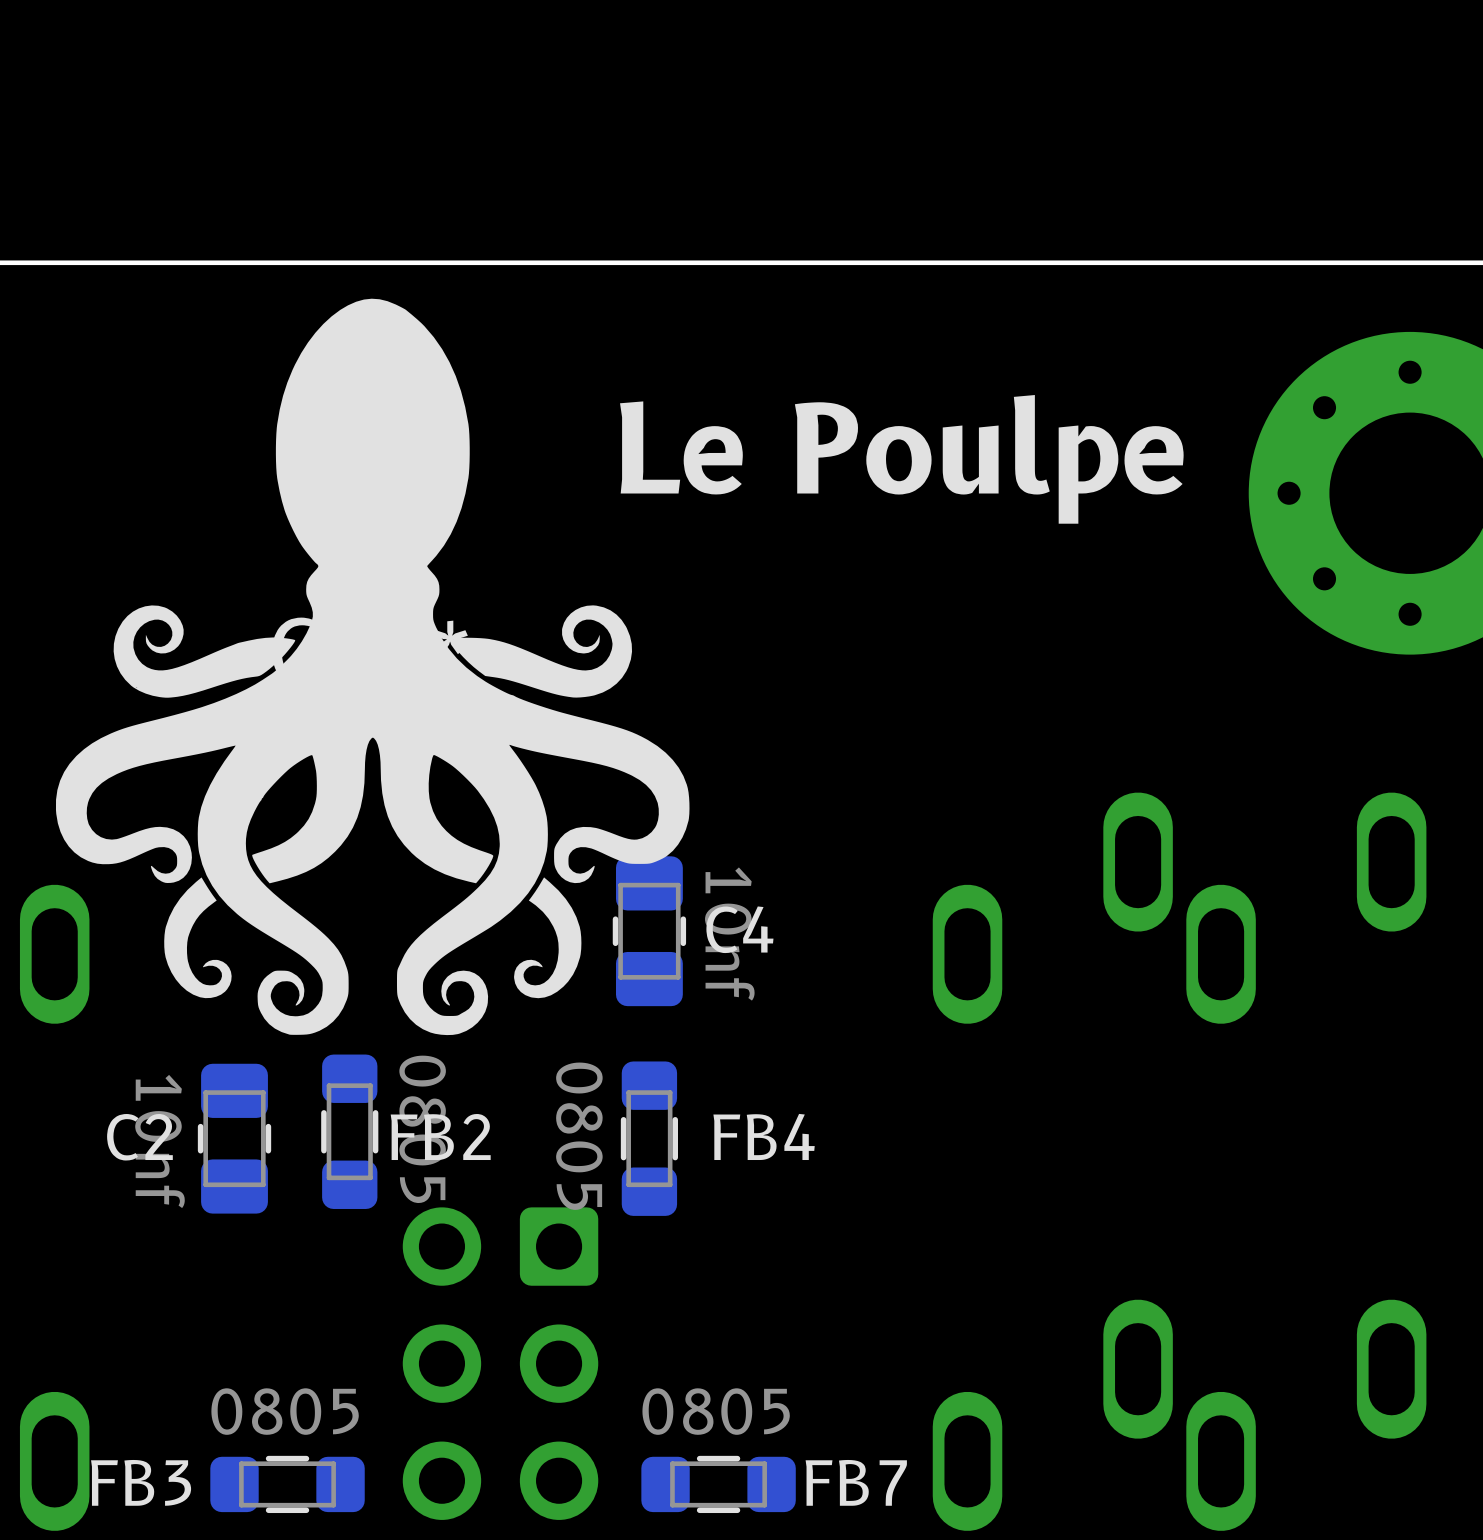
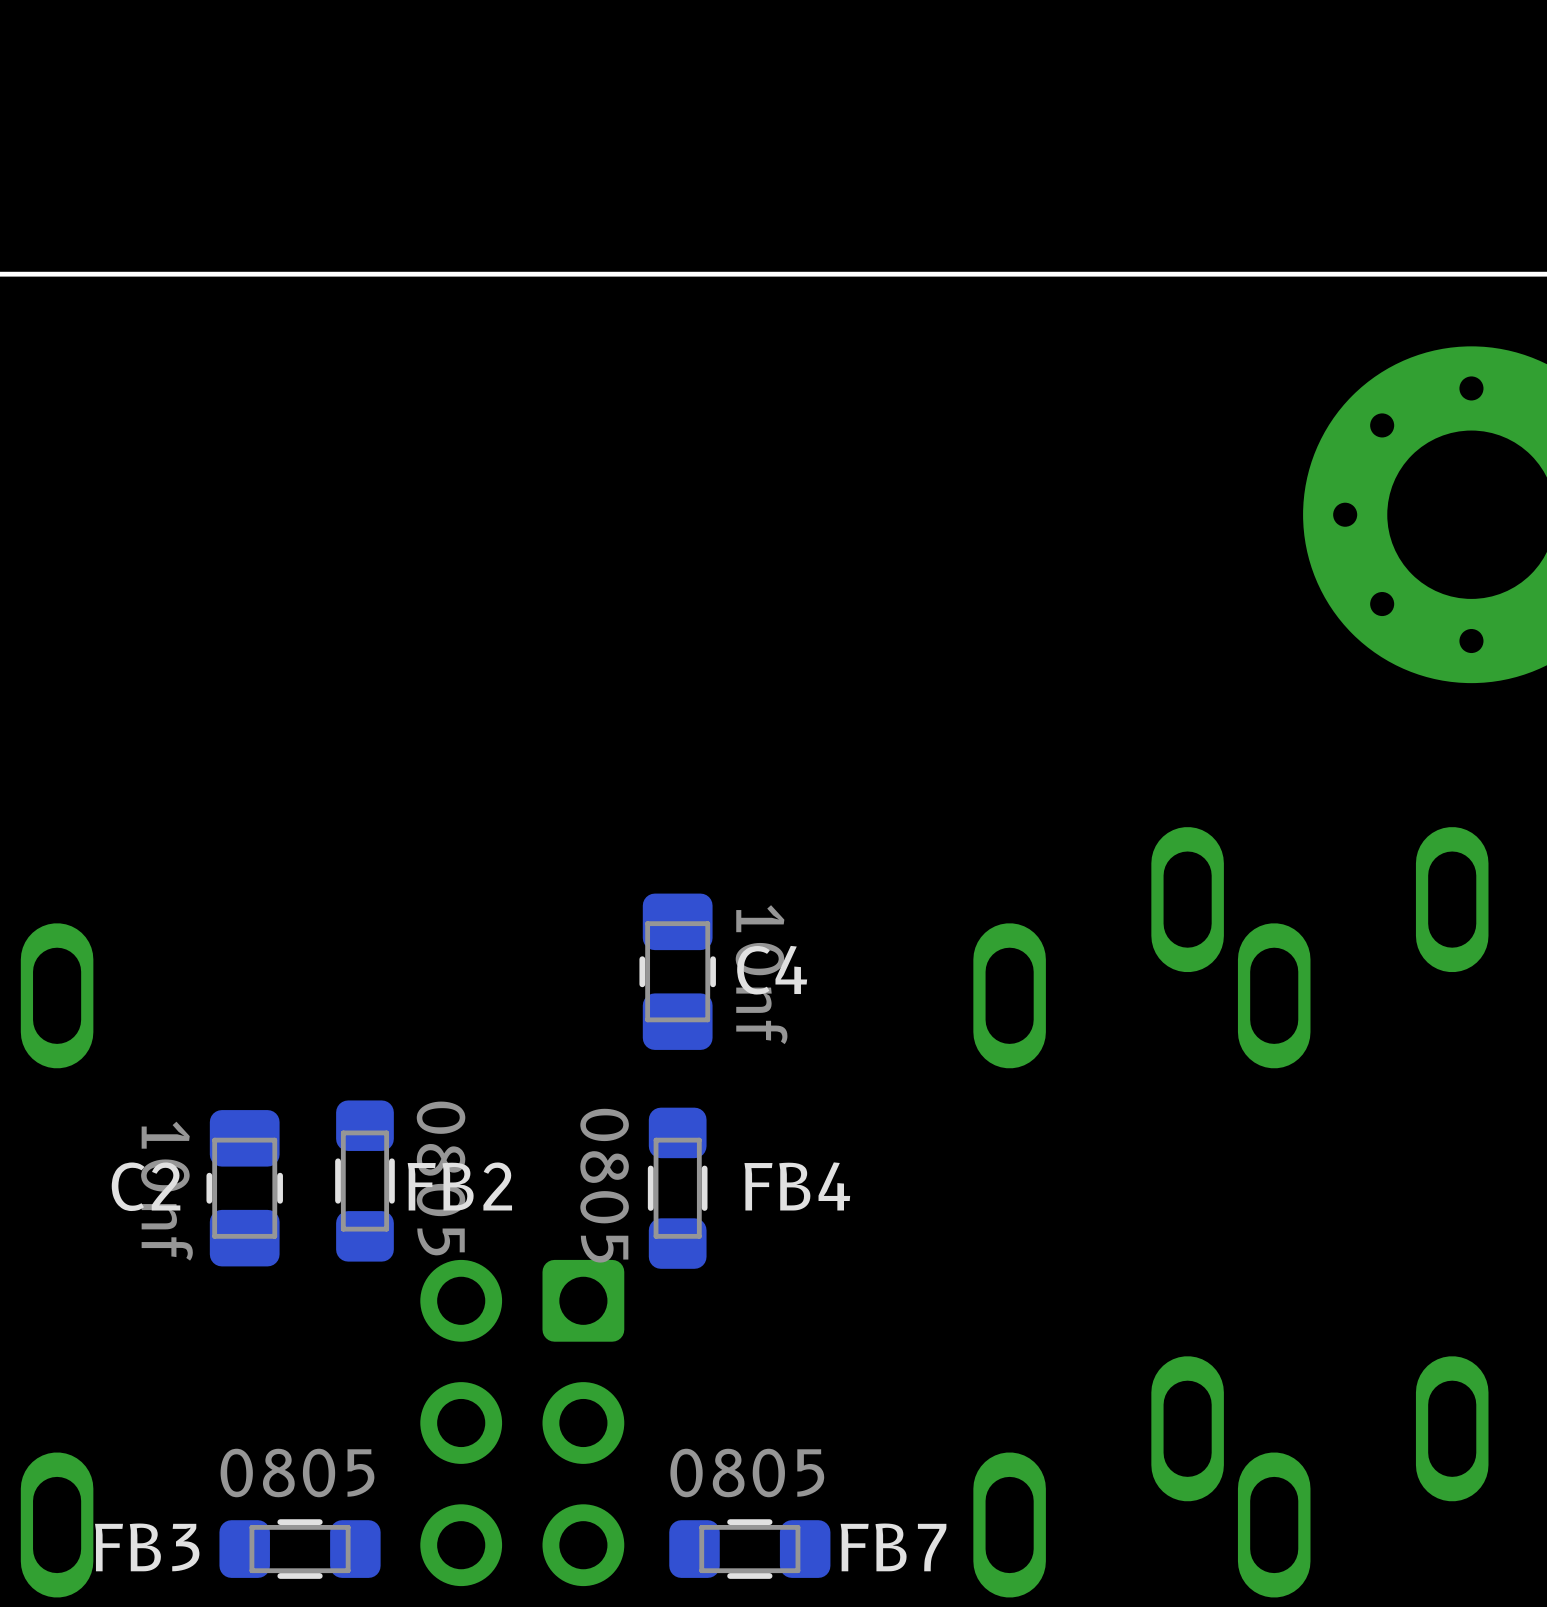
text: Le Poulpe (901, 459) -> none
part: (372, 666) -> none

